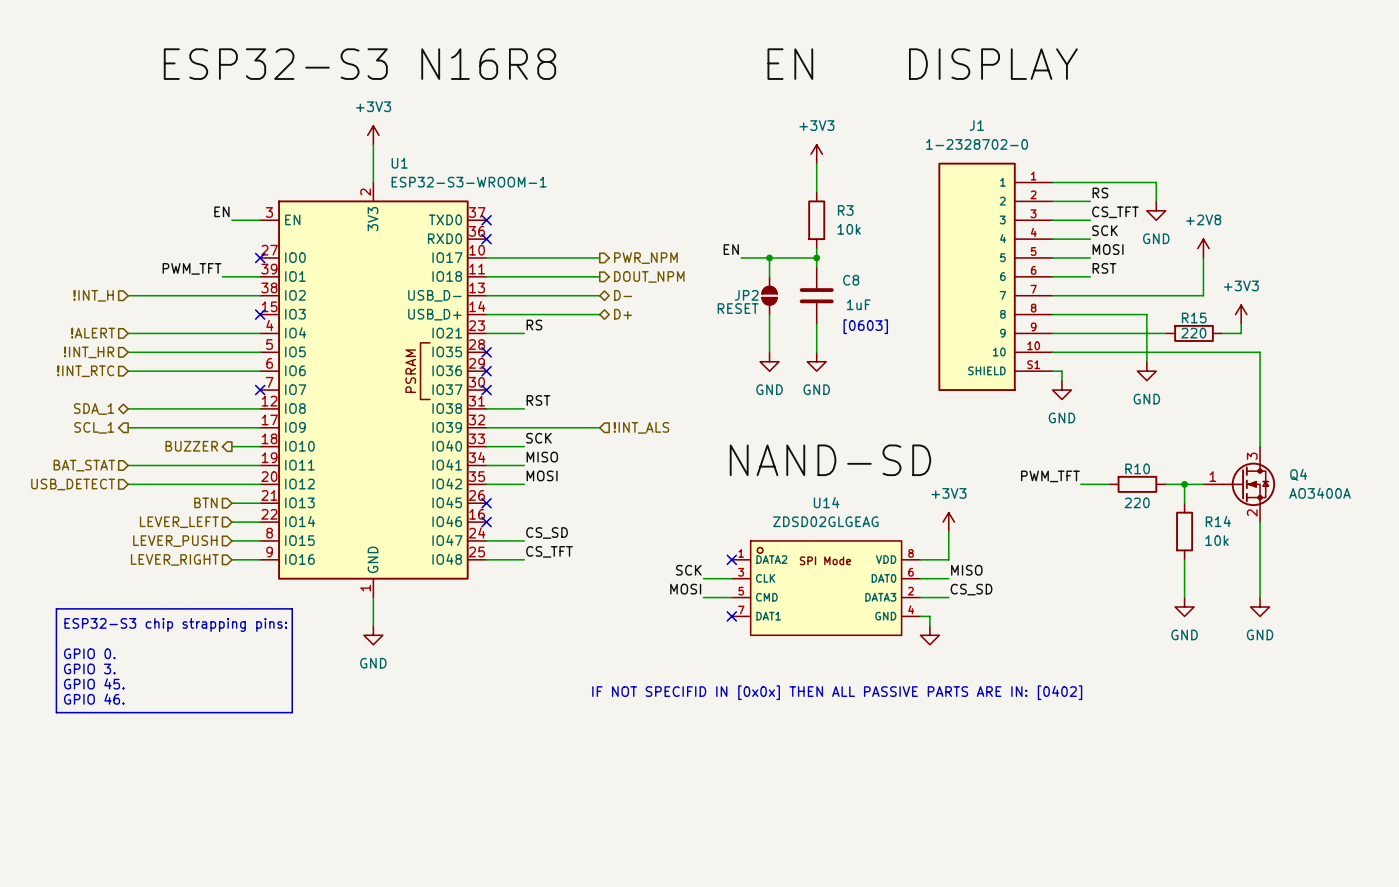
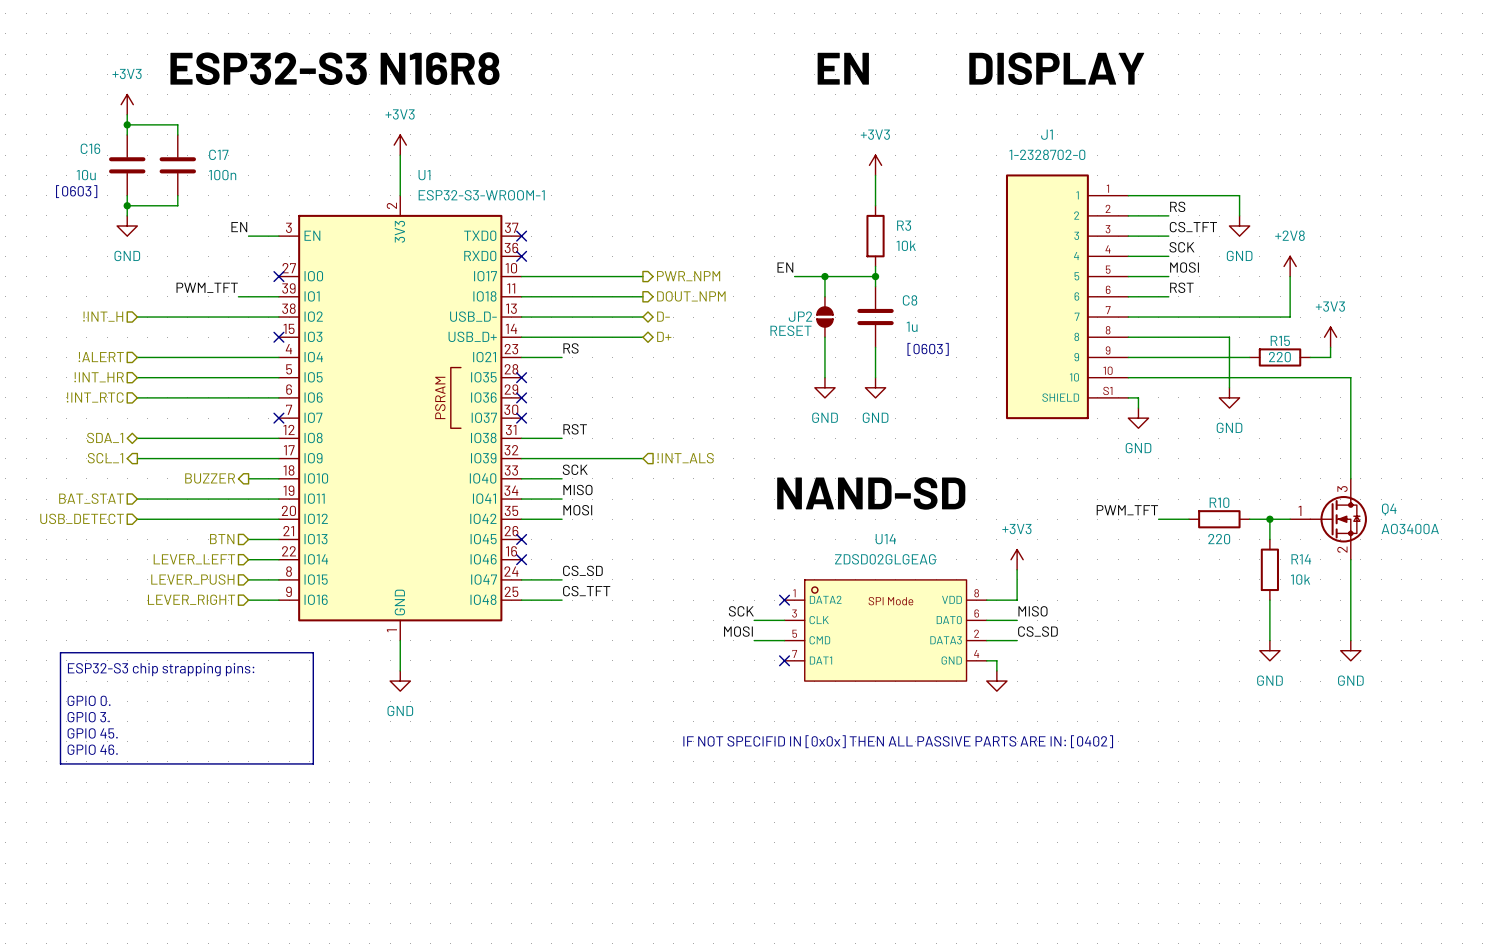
power symbol: none -> +3V3 (127, 104)
wire: none -> (127, 114) (127, 134)
wire: none -> (127, 124) (177, 124) (177, 134)
junction: none -> (127, 124)
C16: none -> 10u (127, 165)
C17: none -> 100n (177, 165)
text: none -> [0603] (76, 191)
wire: none -> (127, 195) (127, 215)
wire: none -> (177, 195) (177, 205) (127, 205)
junction: none -> (127, 205)
power symbol: none -> GND (127, 226)
C8 value: 1uF (858, 304) -> 1u (912, 326)

